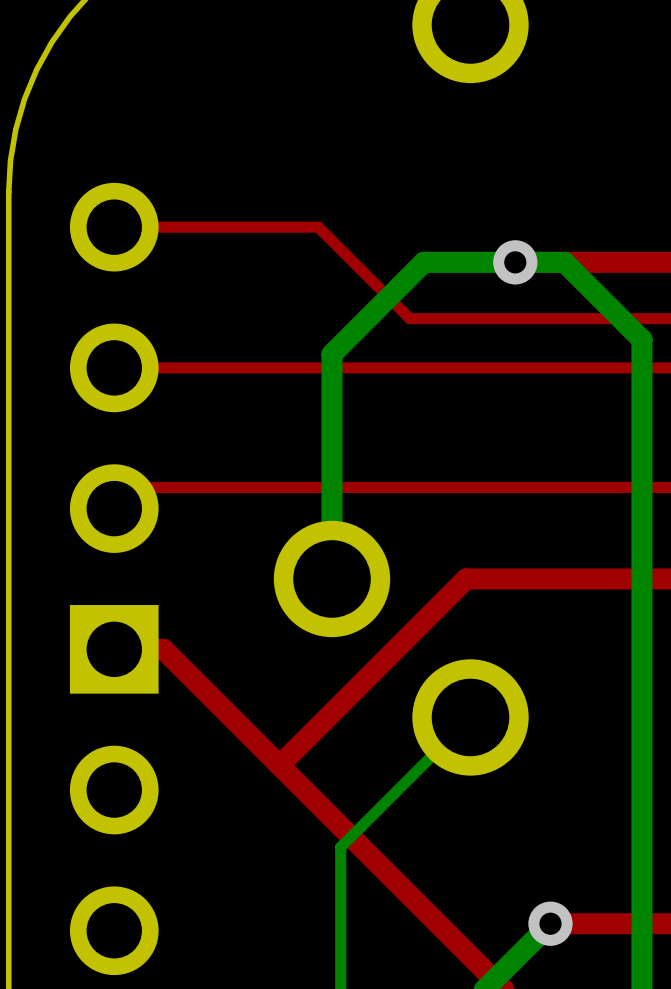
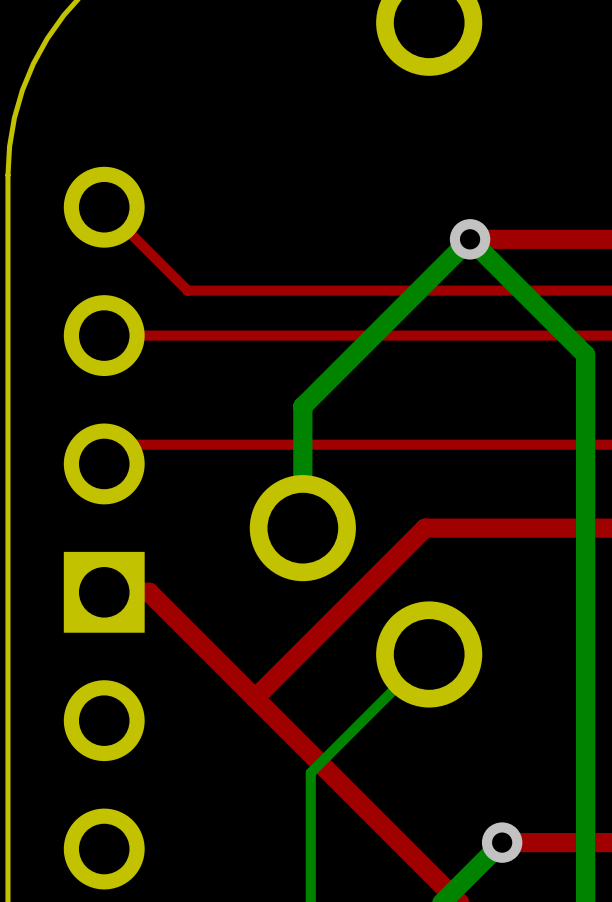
top track: (114, 227) (318, 227) (409, 318) -> (104, 207) (187, 290) (373, 290)
bottom track: (641, 389) (641, 339) (564, 262) (423, 262) (332, 354) (332, 445) -> (585, 354) (470, 239) (302, 406)

